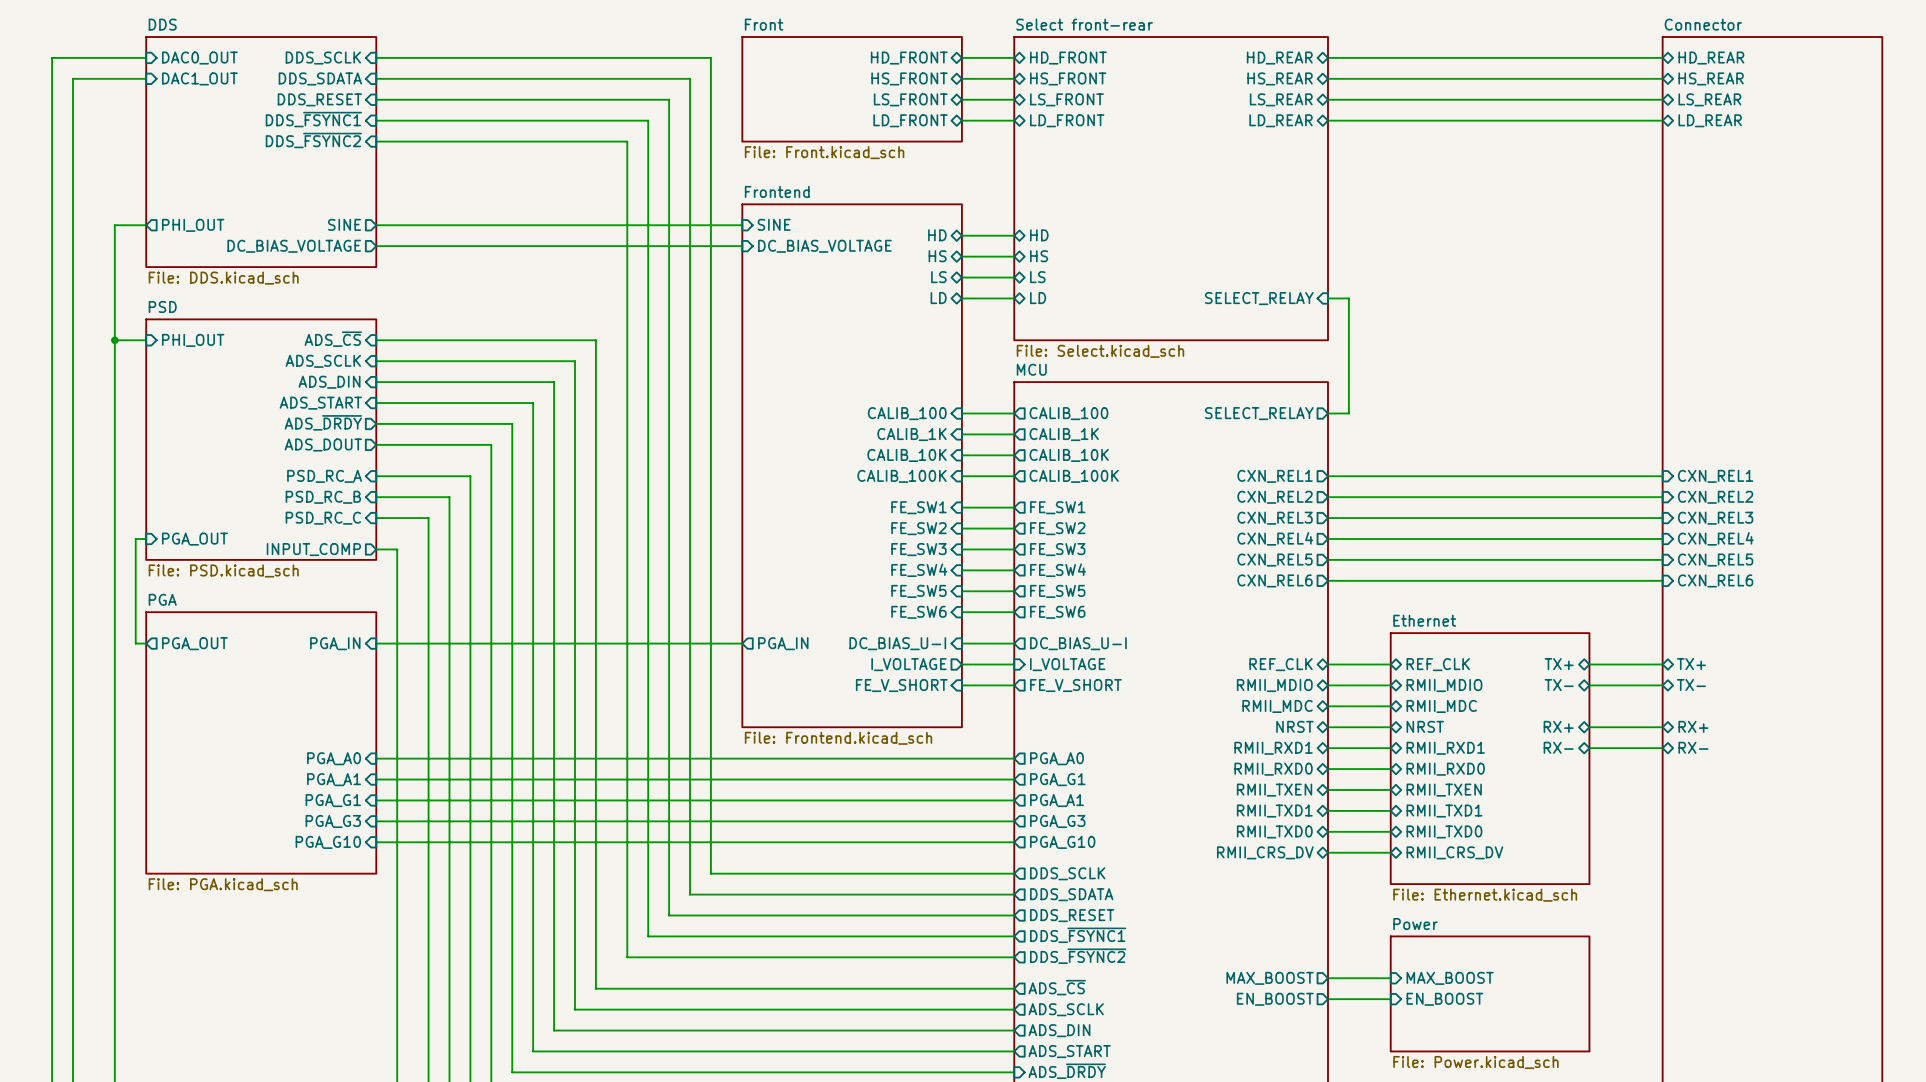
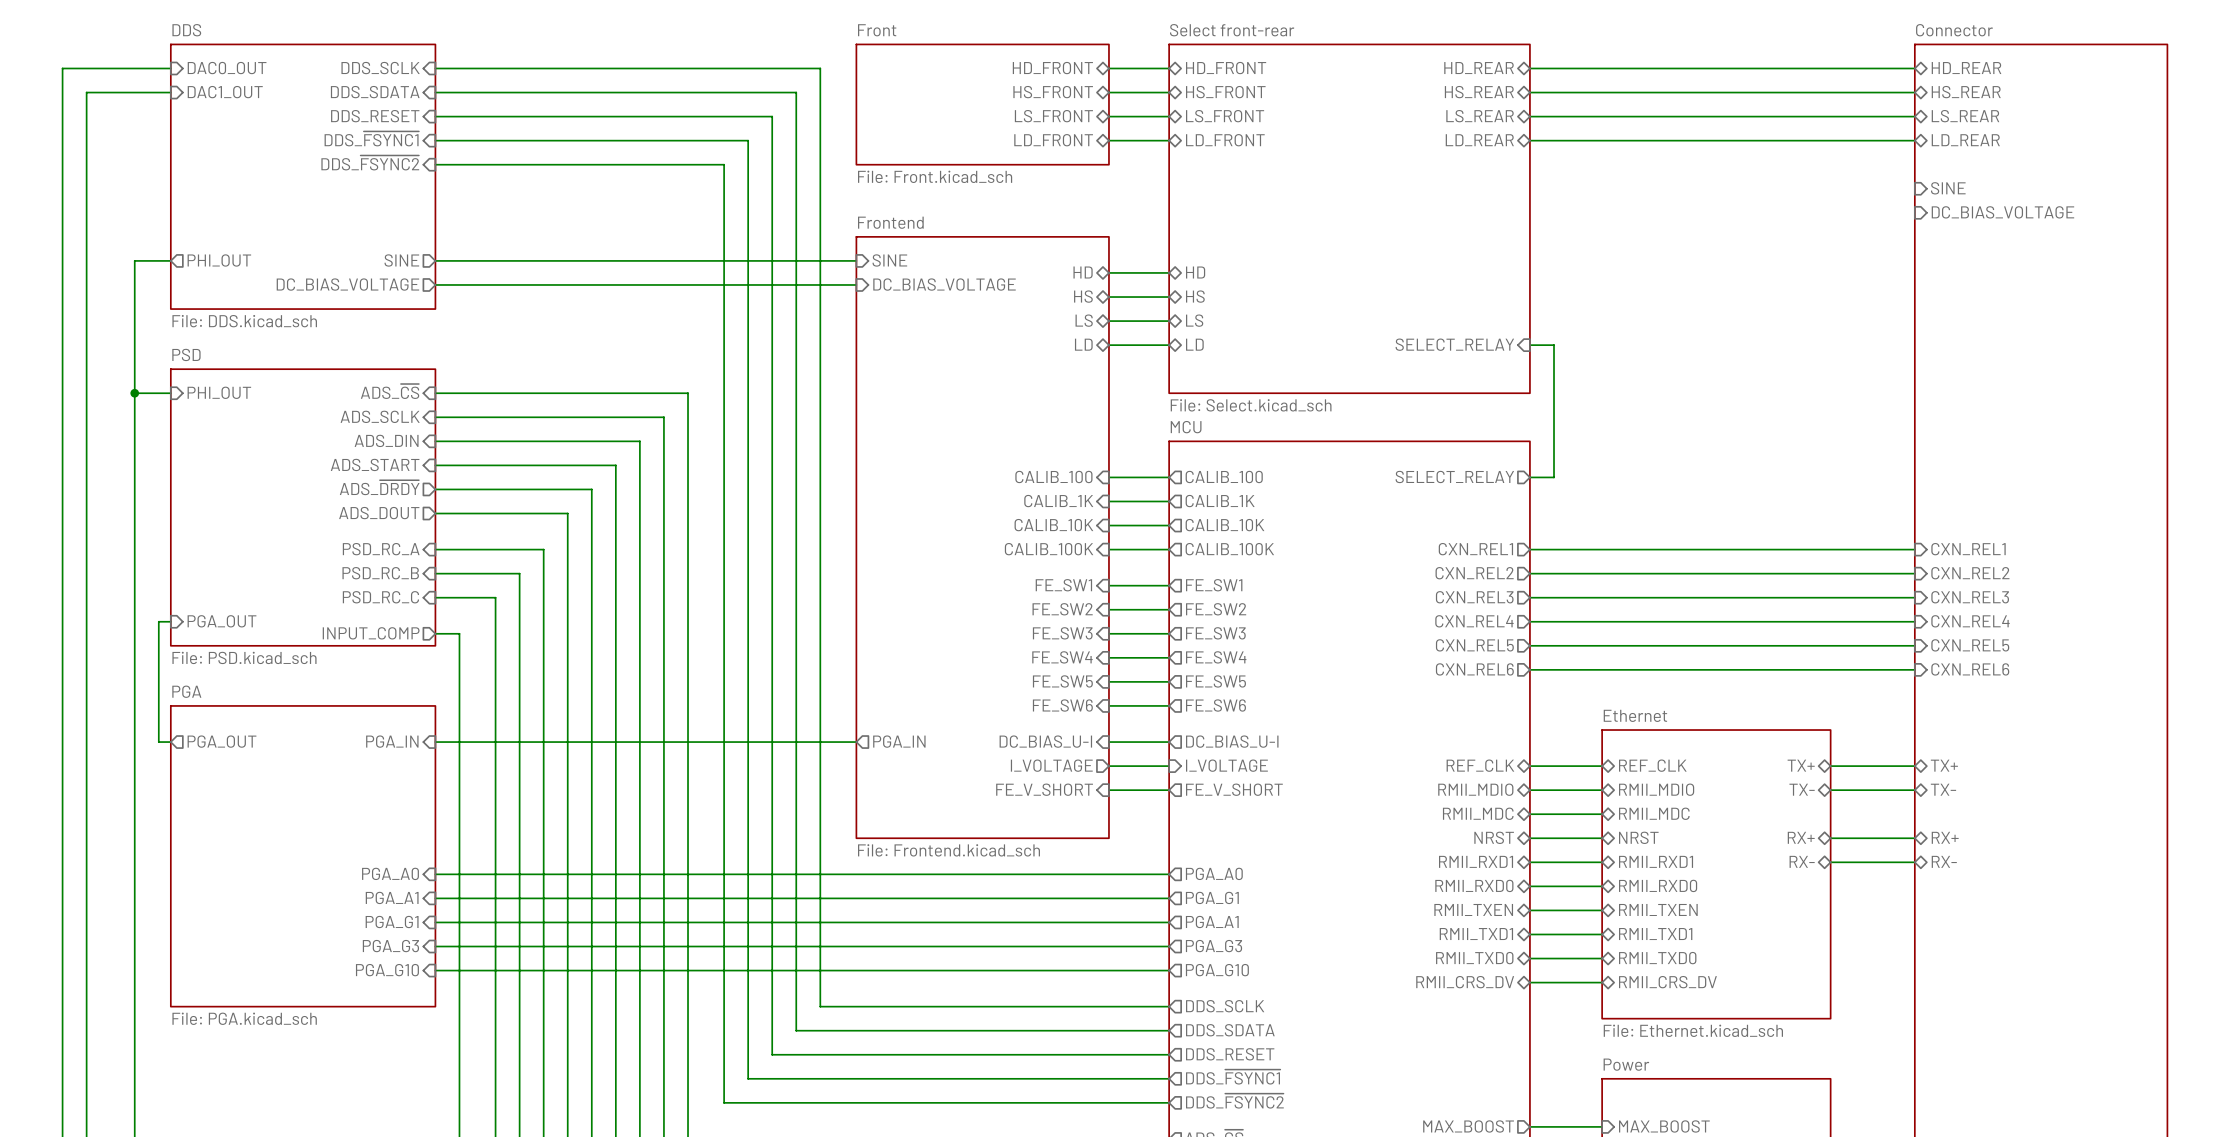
sheet pin: none -> SINE (1948, 188)
sheet pin: none -> DC_BIAS_VOLTAGE (2002, 212)

